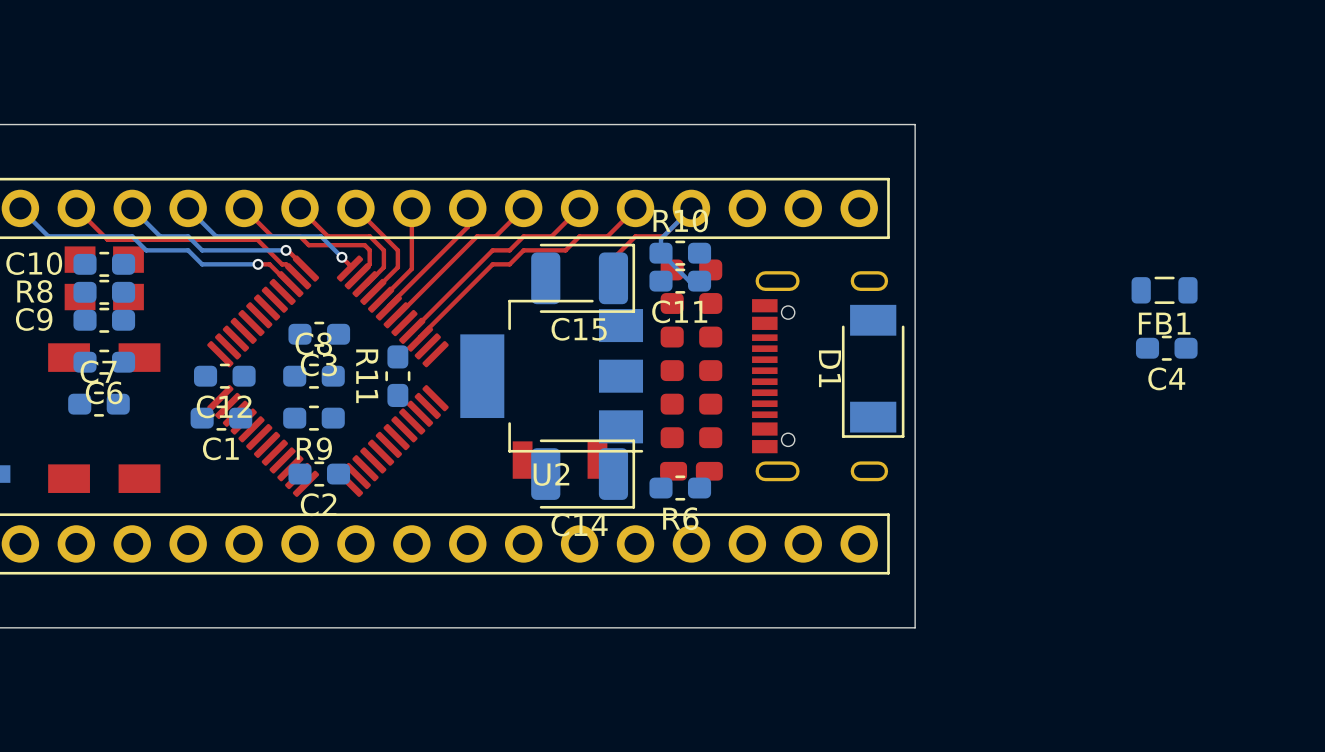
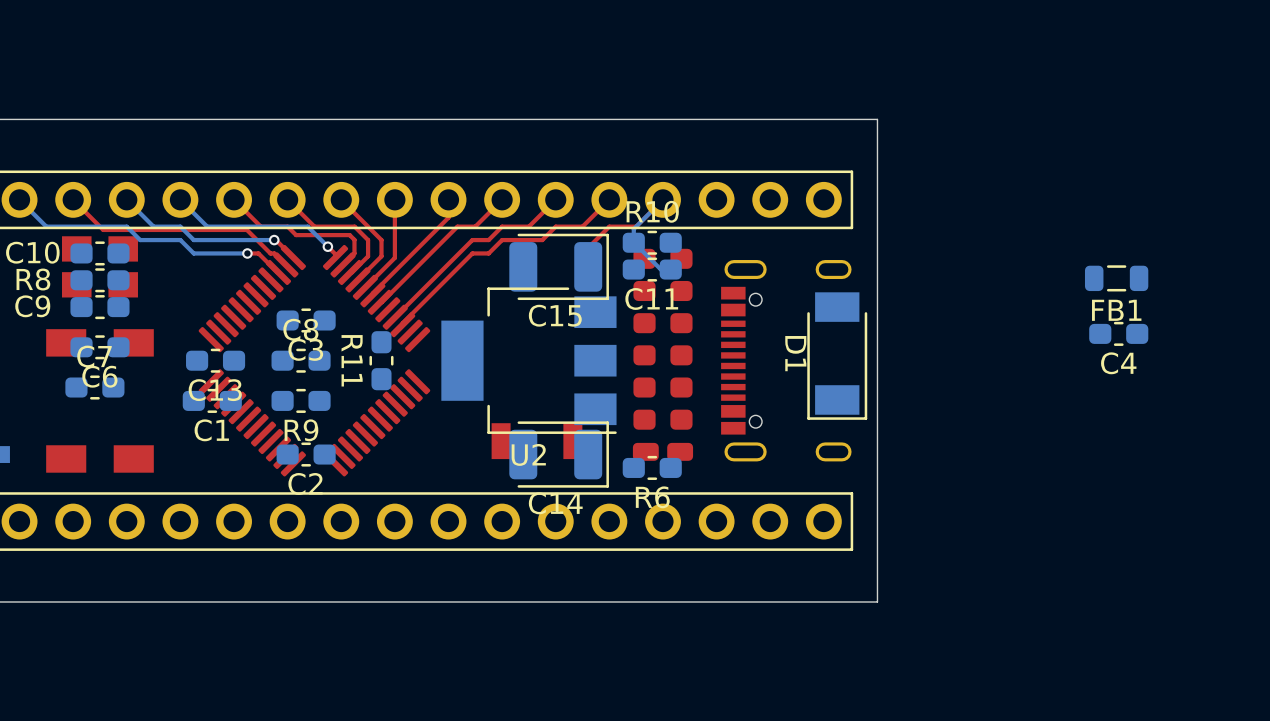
C12 name: C12 (224, 406) -> C13 (215, 390)

